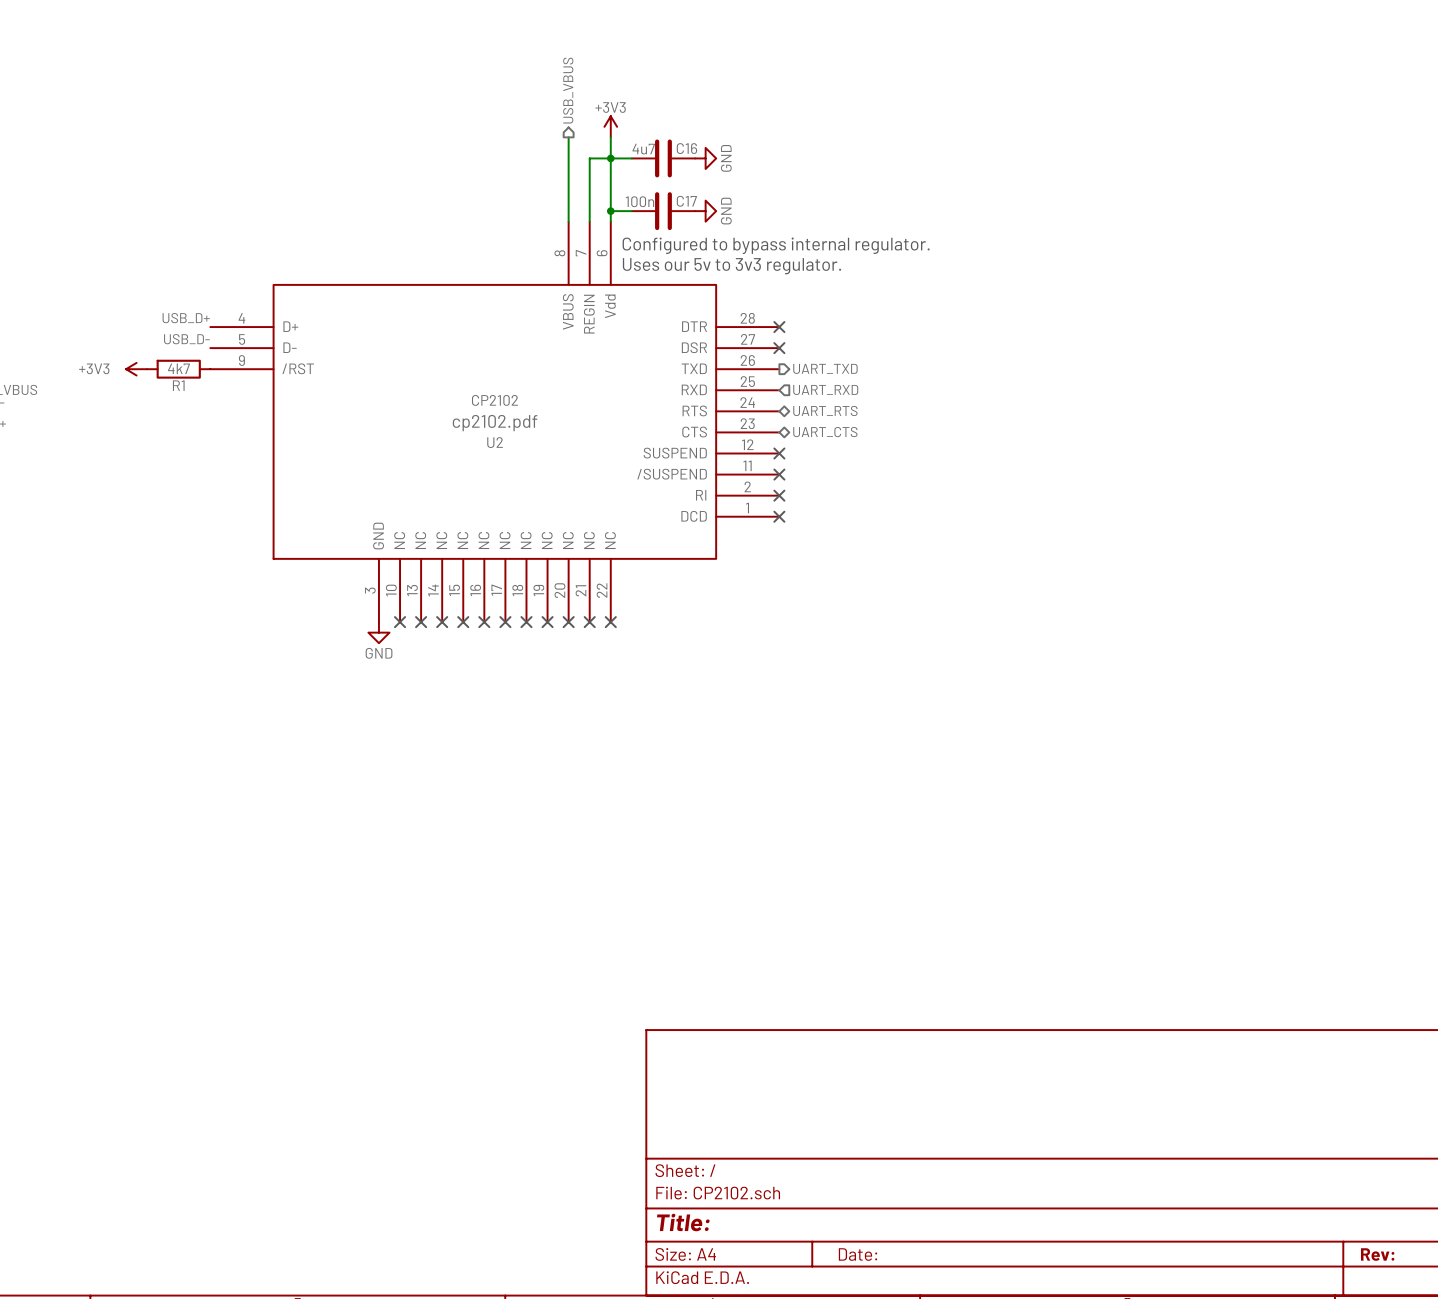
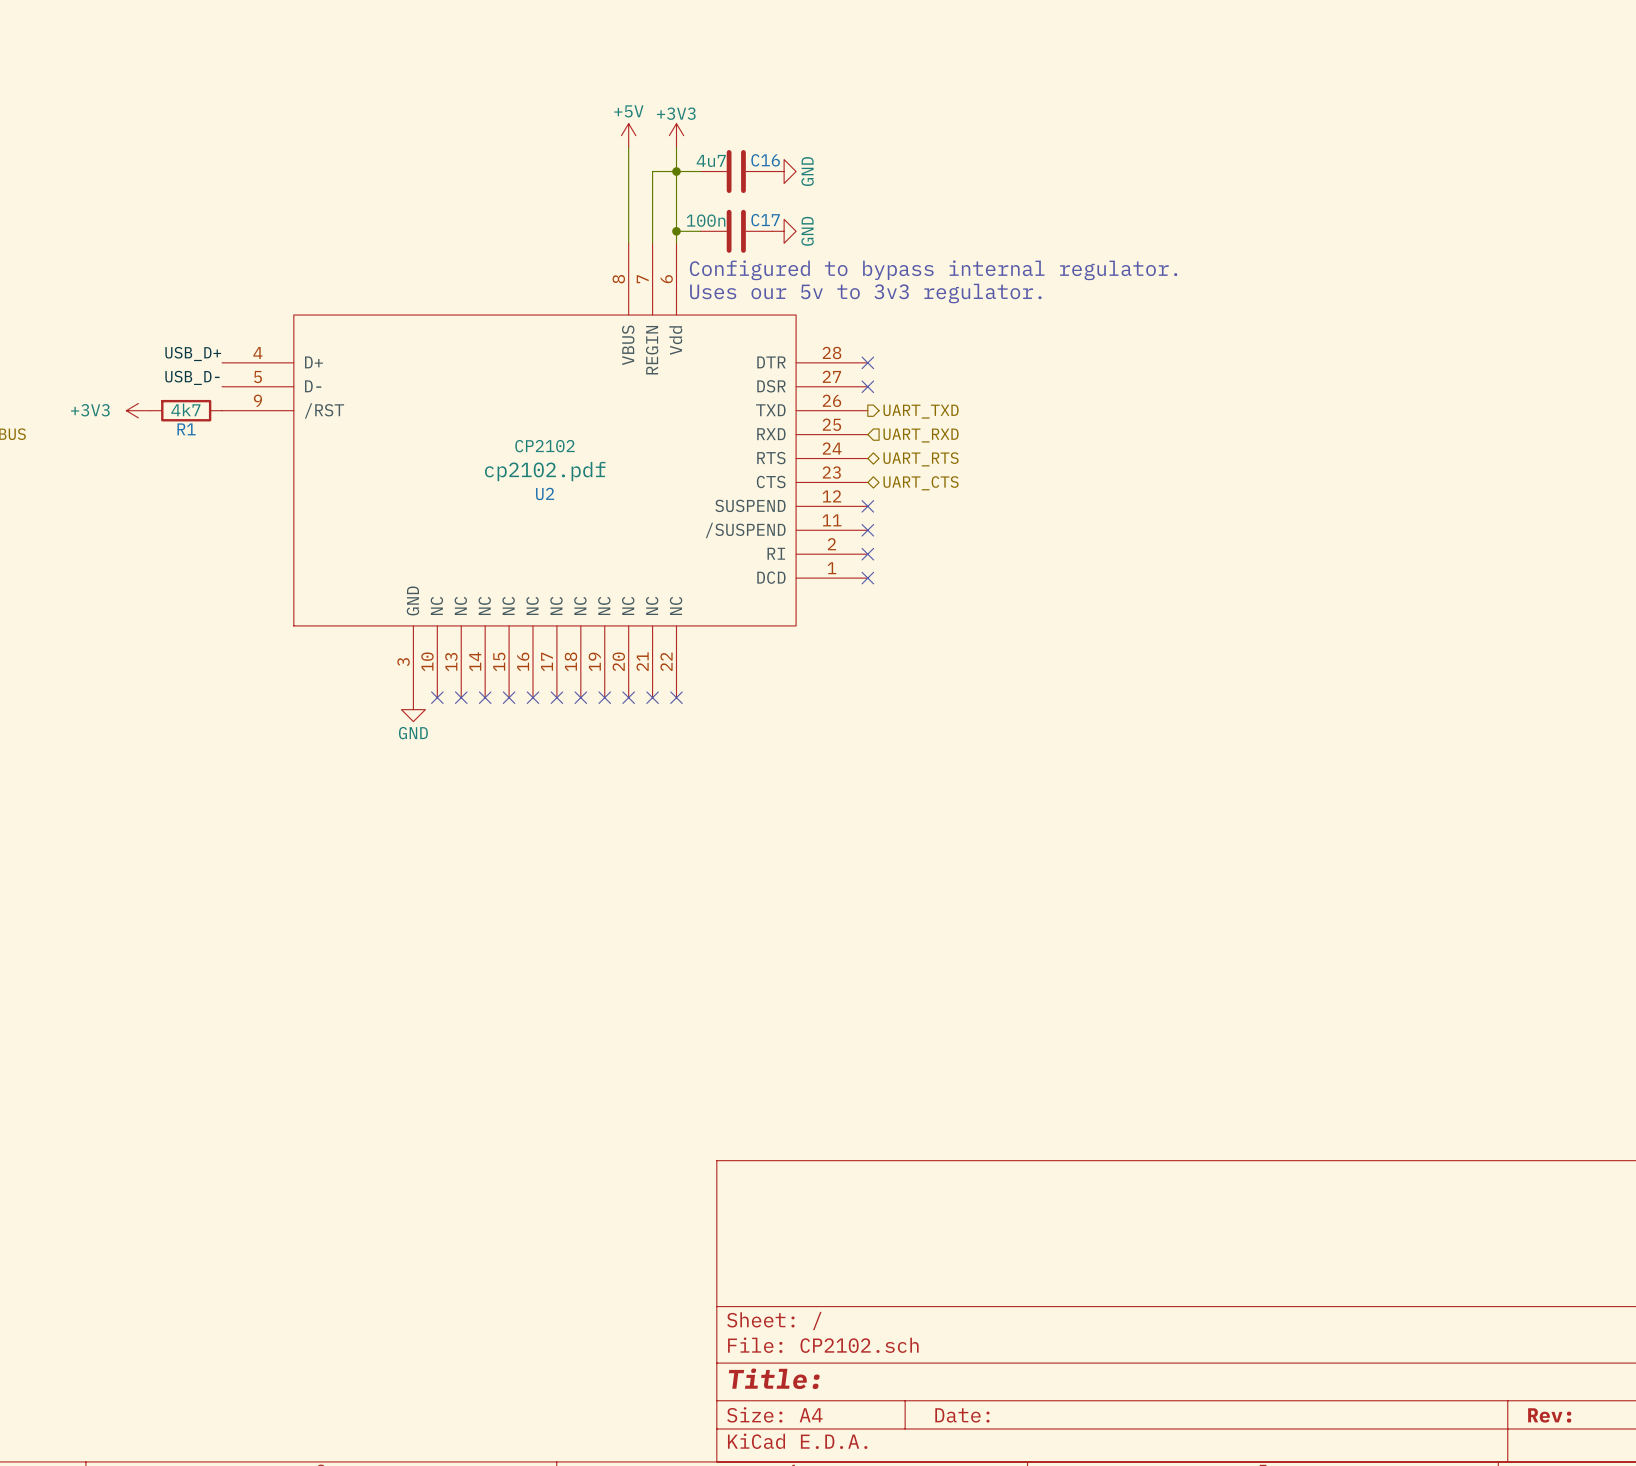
hierarchical label: USB_VBUS (568, 90) -> none
power symbol: none -> +5V (628, 135)

